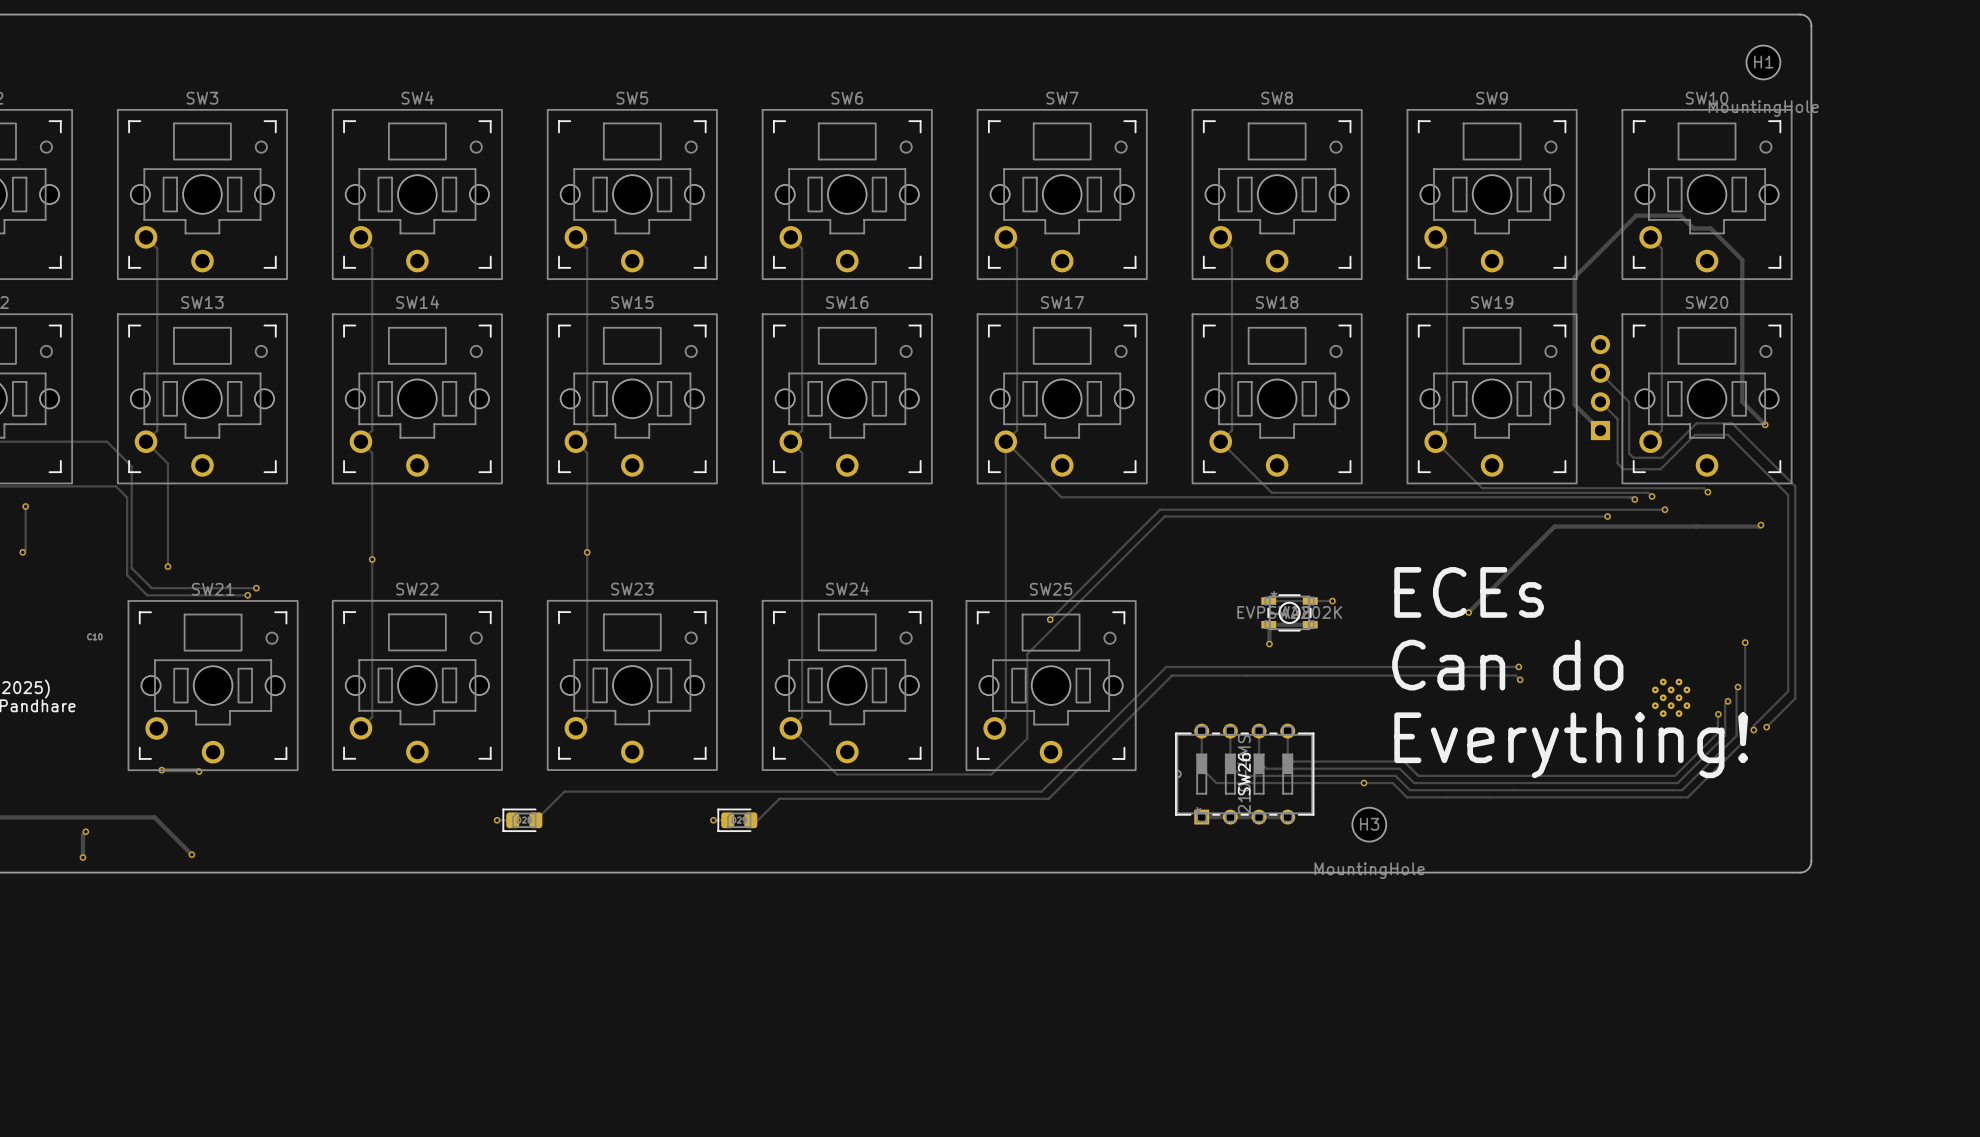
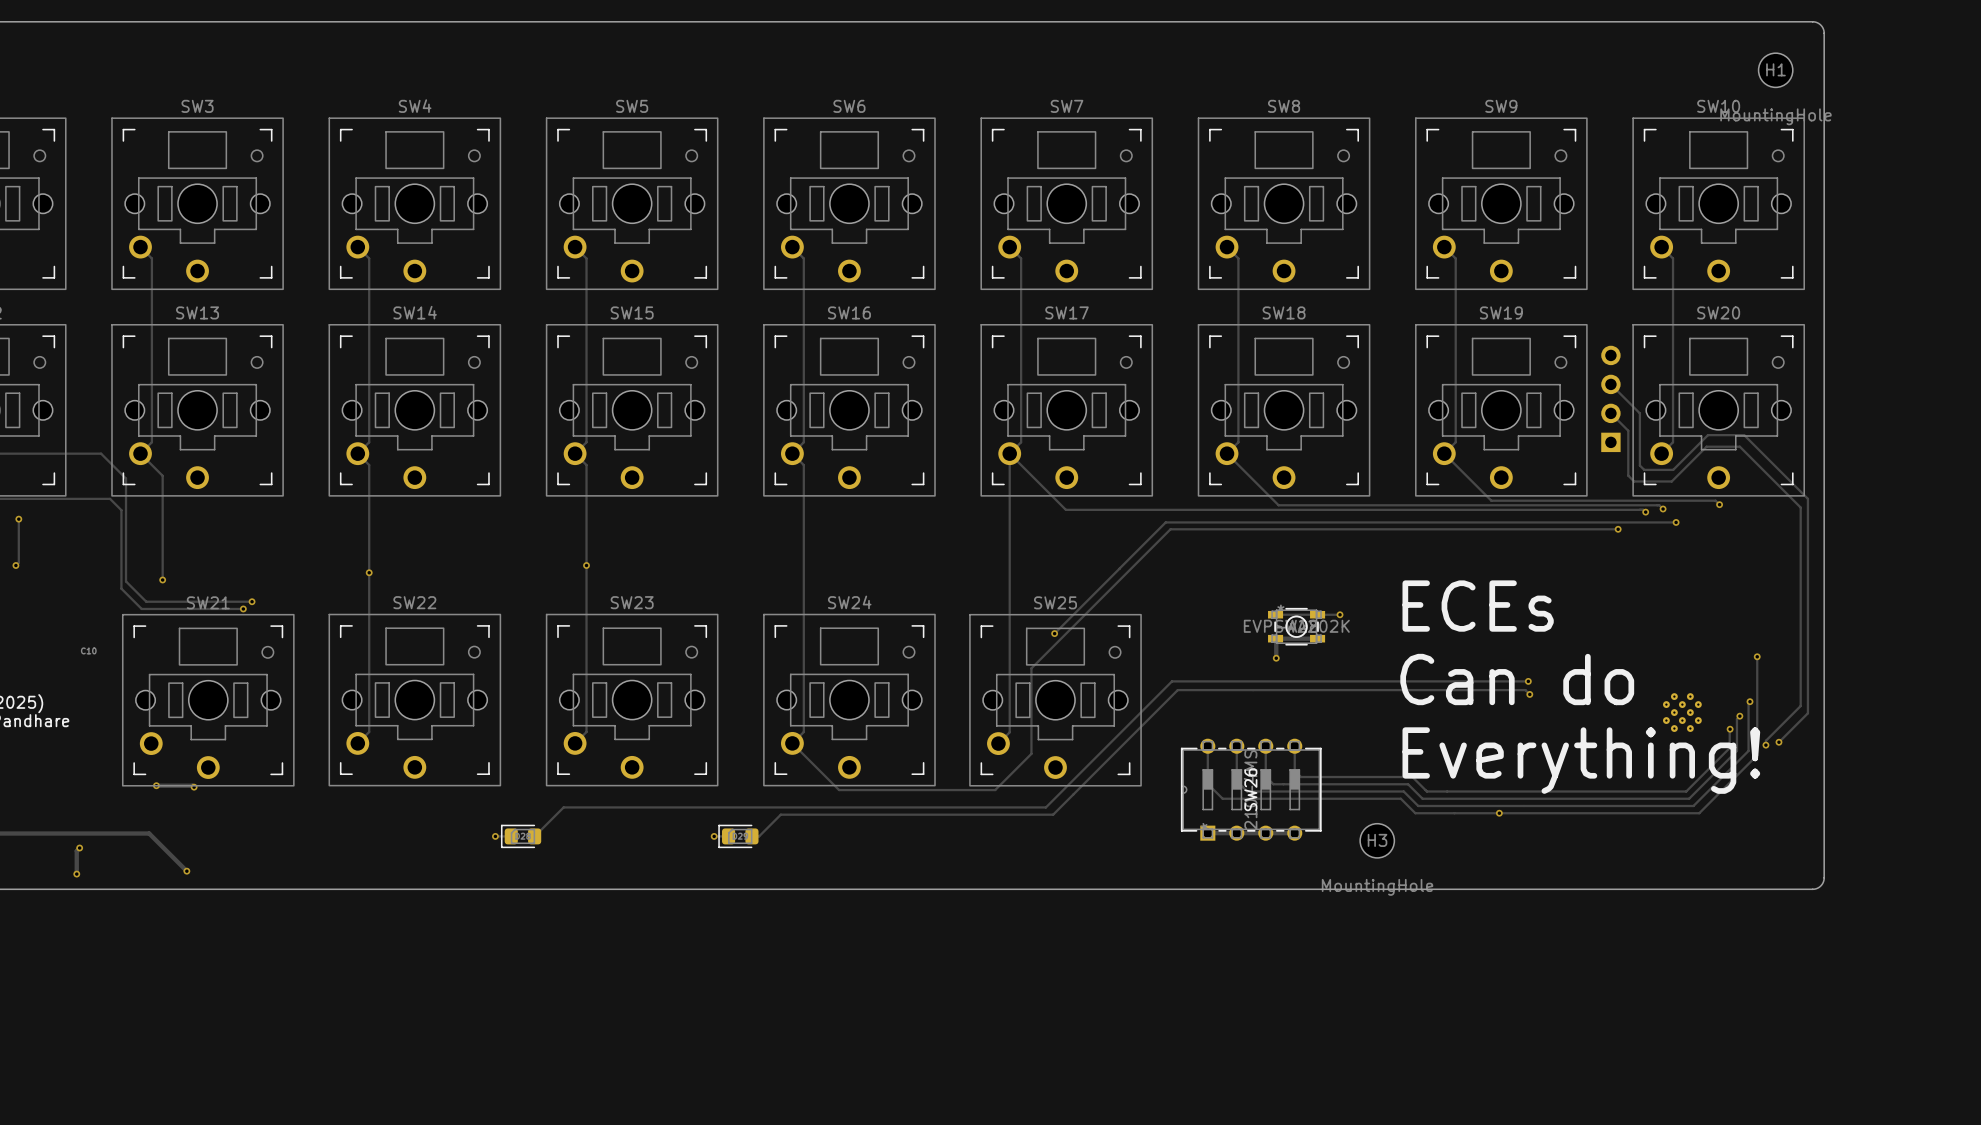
track: (1765, 424) (1742, 401) (1742, 260) (1710, 228) (1693, 228) (1680, 215) (1636, 215) (1574, 277) (1574, 404) (1600, 430) -> none
via: (1765, 424) -> none
track: (1760, 525) (1554, 526) (1468, 612) -> none
via: (1760, 525) -> none
via: (1468, 612) -> none
via: (1364, 783) -> none
via: none -> (1499, 813)

